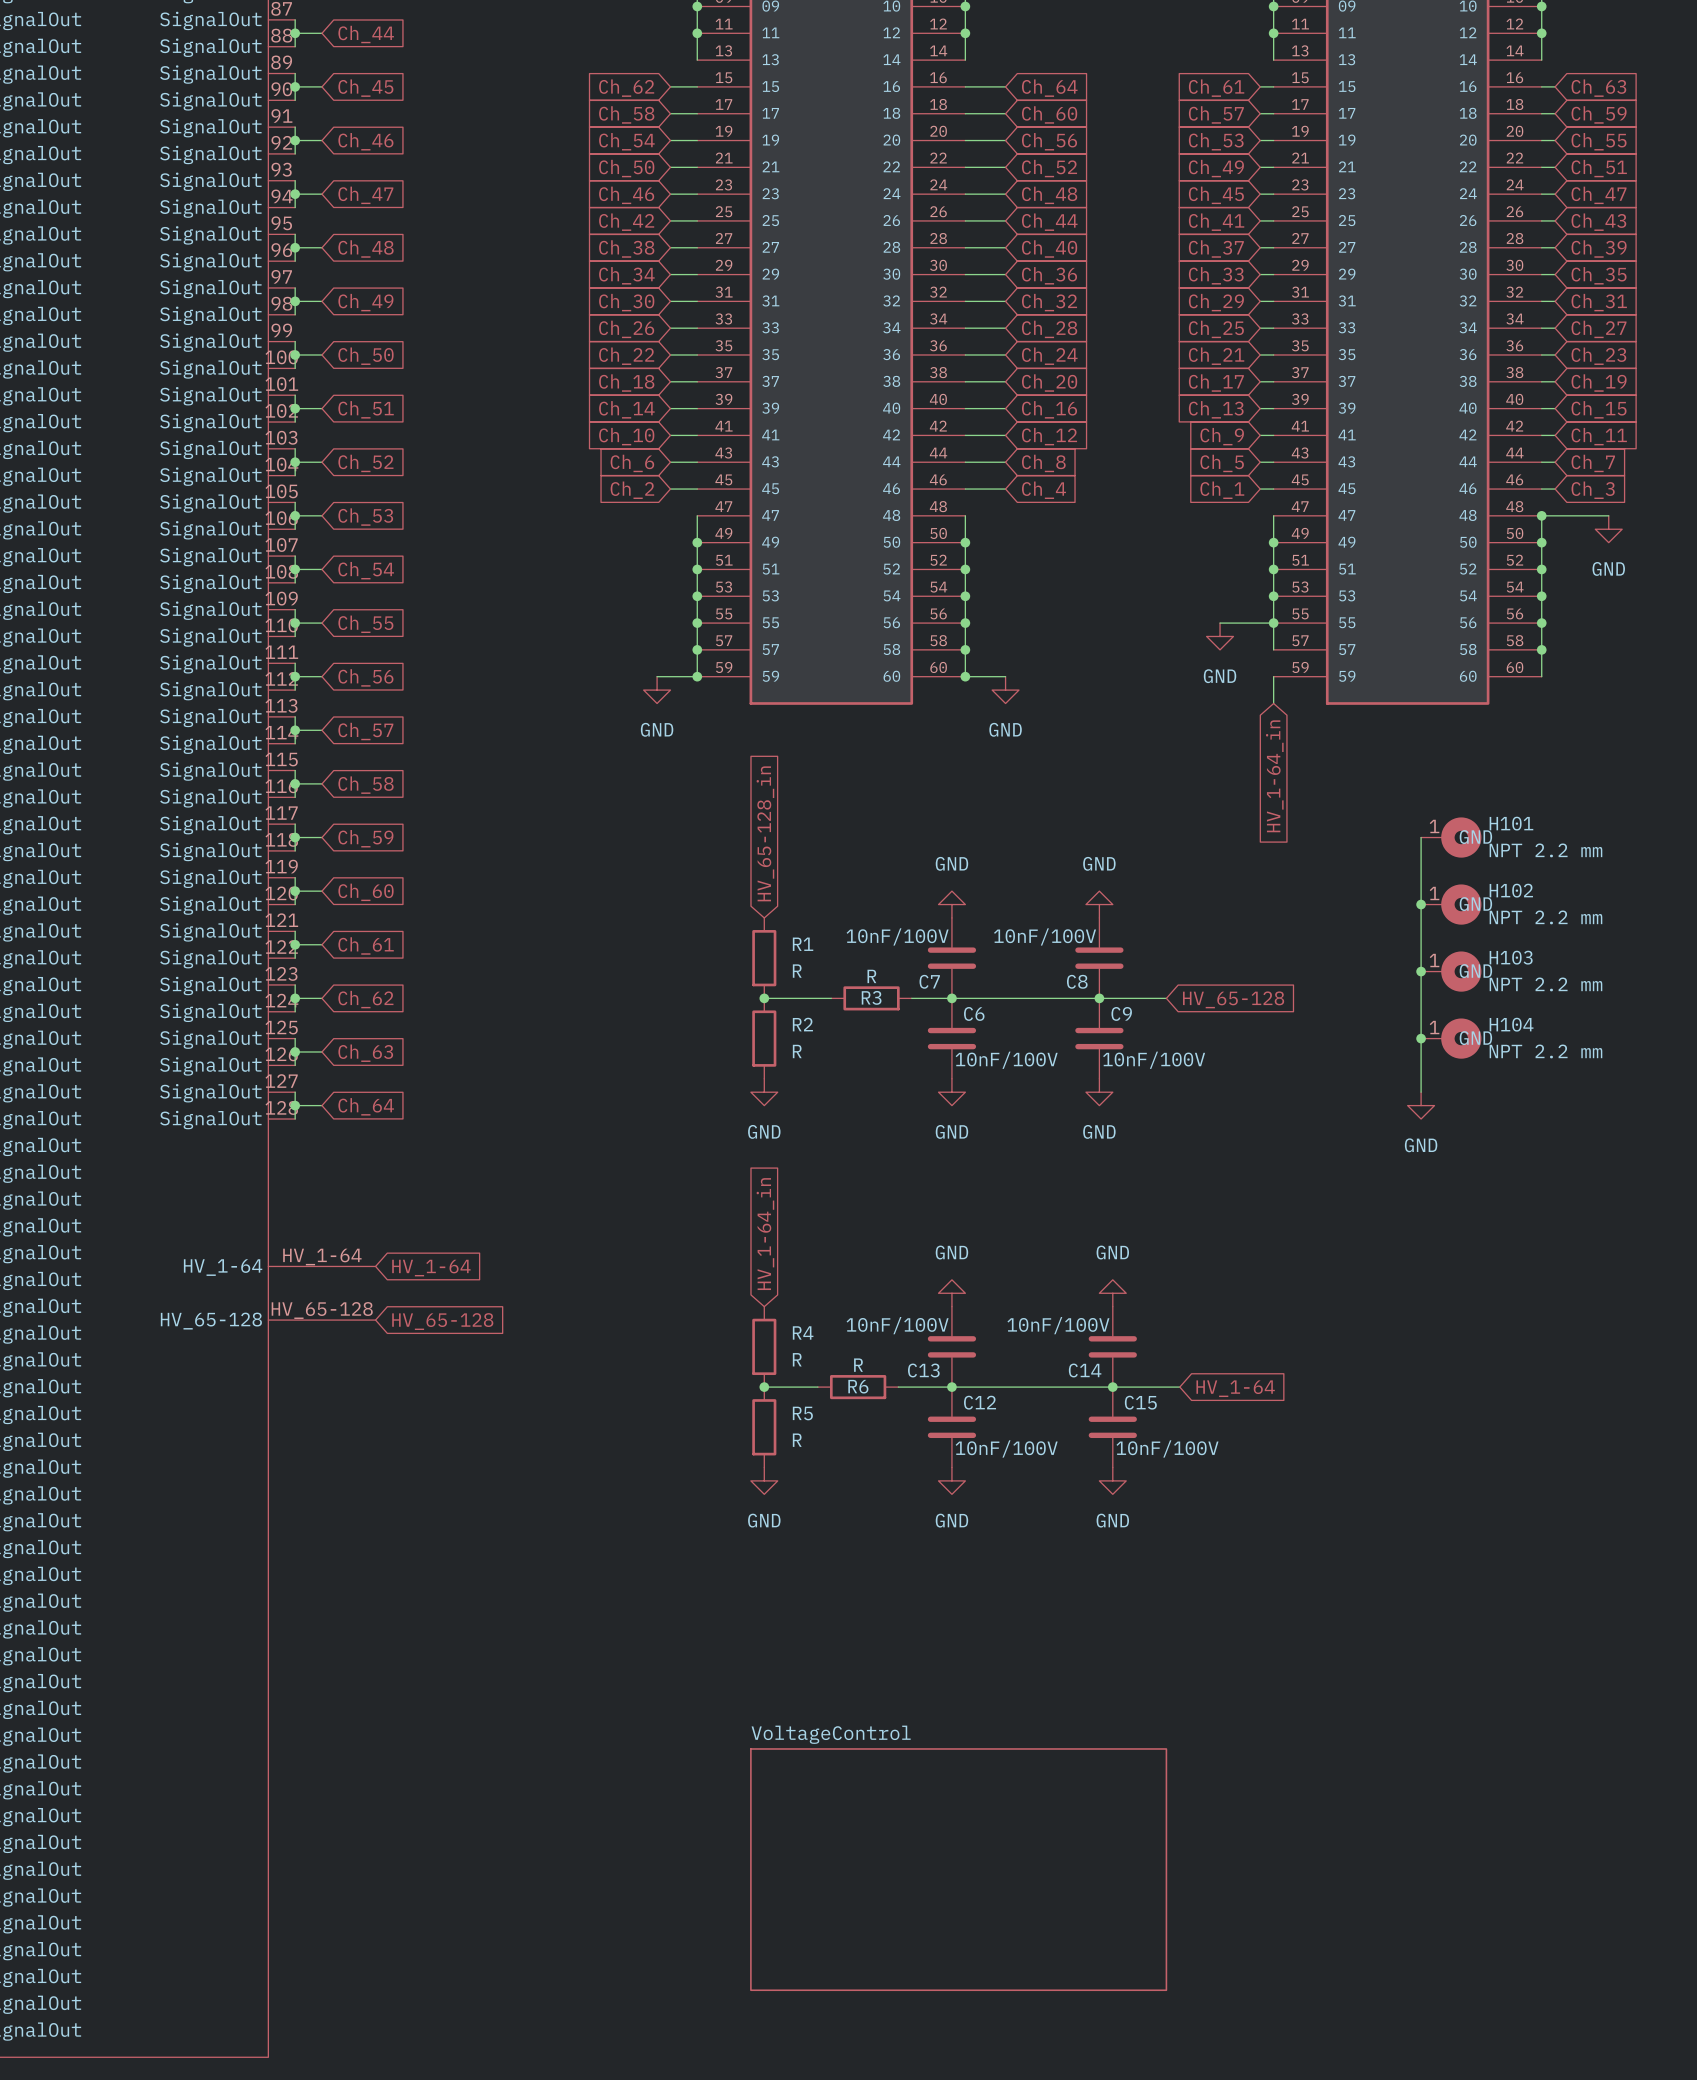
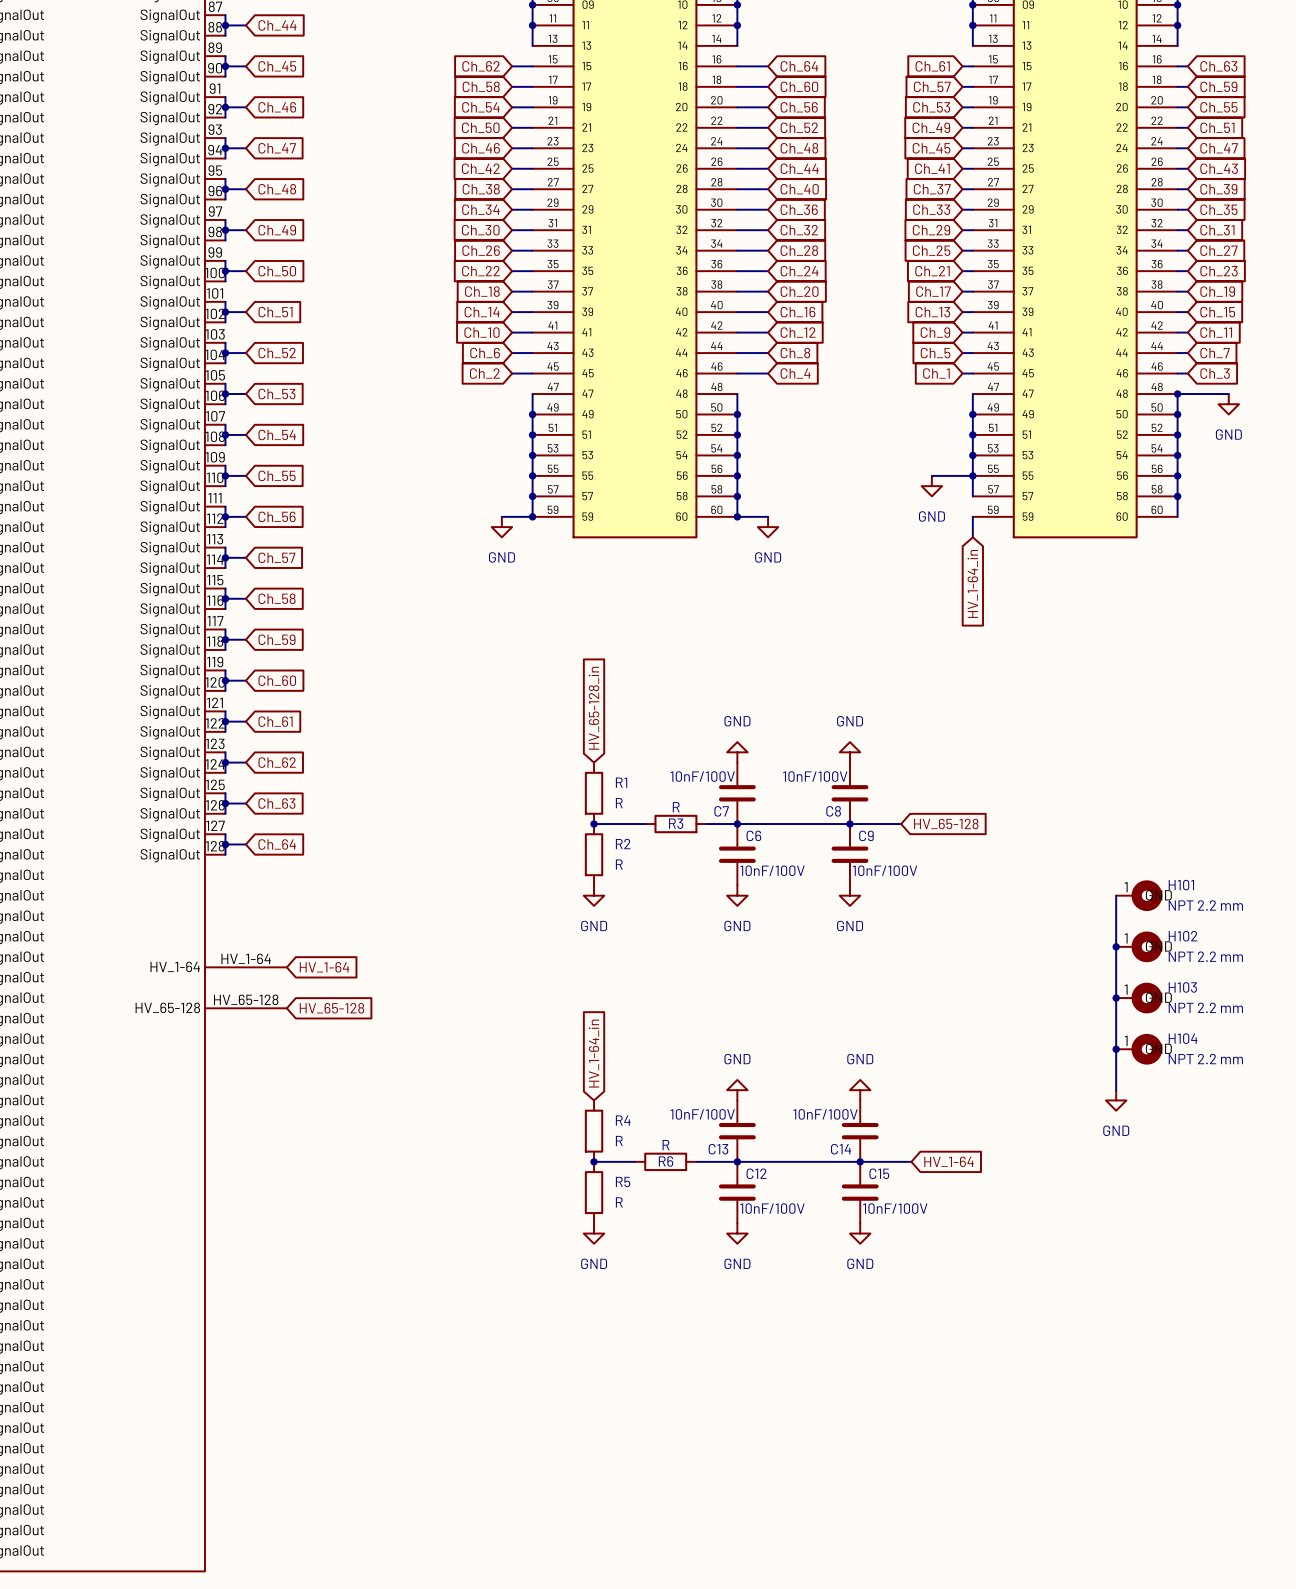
global label position: HV_65-128_in (765, 833) -> HV_65-128_in (594, 708)
wire: (1421, 837) (1421, 1092) -> none
H101 position: (1451, 837) -> (1139, 895)
power symbol: GND (951, 904) -> none
power symbol: GND (1099, 904) -> none
junction: (1421, 904) -> none
H102 position: (1451, 904) -> (1139, 946)
R1 position: (764, 958) -> (594, 793)
C7 position: (951, 958) -> (737, 793)
C8 position: (1099, 958) -> (849, 793)
junction: (1421, 971) -> none
H103 position: (1451, 971) -> (1139, 998)
power symbol: none -> GND (737, 752)
power symbol: none -> GND (849, 752)
wire: (764, 998) (831, 998) -> (594, 824) (645, 824)
junction: (764, 998) -> none
R3 position: (871, 998) -> (675, 824)
wire: (911, 998) (1166, 998) -> (706, 824) (901, 824)
junction: (951, 998) -> none
junction: (1099, 998) -> none
global label position: HV_65-128 (1233, 999) -> HV_65-128 (946, 823)
R2 position: (764, 1038) -> (594, 854)
C6 position: (951, 1038) -> (737, 854)
C9 position: (1099, 1038) -> (849, 854)
junction: (1421, 1038) -> none
H104 position: (1451, 1038) -> (1139, 1049)
junction: none -> (594, 824)
junction: none -> (737, 824)
junction: none -> (849, 824)
power symbol position: GND (764, 1092) -> GND (594, 895)
power symbol: GND (951, 1092) -> none
power symbol: GND (1099, 1092) -> none
power symbol: GND (1421, 1105) -> none
power symbol: none -> GND (737, 895)
power symbol: none -> GND (849, 895)
wire: none -> (1116, 895) (1116, 1090)
global label position: HV_1-64_in (765, 1234) -> HV_1-64_in (594, 1053)
junction: none -> (1116, 946)
power symbol: GND (951, 1293) -> none
power symbol: GND (1112, 1293) -> none
junction: none -> (1116, 998)
R4 position: (764, 1346) -> (594, 1131)
C13 position: (951, 1346) -> (737, 1131)
C14 position: (1112, 1346) -> (860, 1131)
junction: none -> (1116, 1049)
wire: (764, 1387) (817, 1387) -> (594, 1161) (634, 1161)
junction: (764, 1387) -> none
R6 position: (858, 1387) -> (665, 1161)
wire: (898, 1387) (1179, 1387) -> (696, 1161) (911, 1161)
junction: (951, 1387) -> none
junction: (1112, 1387) -> none
global label position: HV_1-64 (1235, 1388) -> HV_1-64 (949, 1161)
R5 position: (764, 1427) -> (594, 1192)
C12 position: (951, 1427) -> (737, 1192)
C15 position: (1112, 1427) -> (860, 1192)
power symbol: none -> GND (1116, 1100)
power symbol: GND (764, 1480) -> none
power symbol rotation: 0° (951, 1480) -> 180° (737, 1090)
power symbol position: GND (951, 1480) -> GND (737, 1090)
power symbol rotation: 0° (1112, 1480) -> 180° (860, 1090)
power symbol position: GND (1112, 1480) -> GND (860, 1090)
junction: none -> (594, 1161)
junction: none -> (737, 1161)
junction: none -> (860, 1161)
power symbol: none -> GND (594, 1233)
power symbol: none -> GND (737, 1233)
power symbol: none -> GND (860, 1233)
sheet VoltageControl: (958, 1869) -> none

